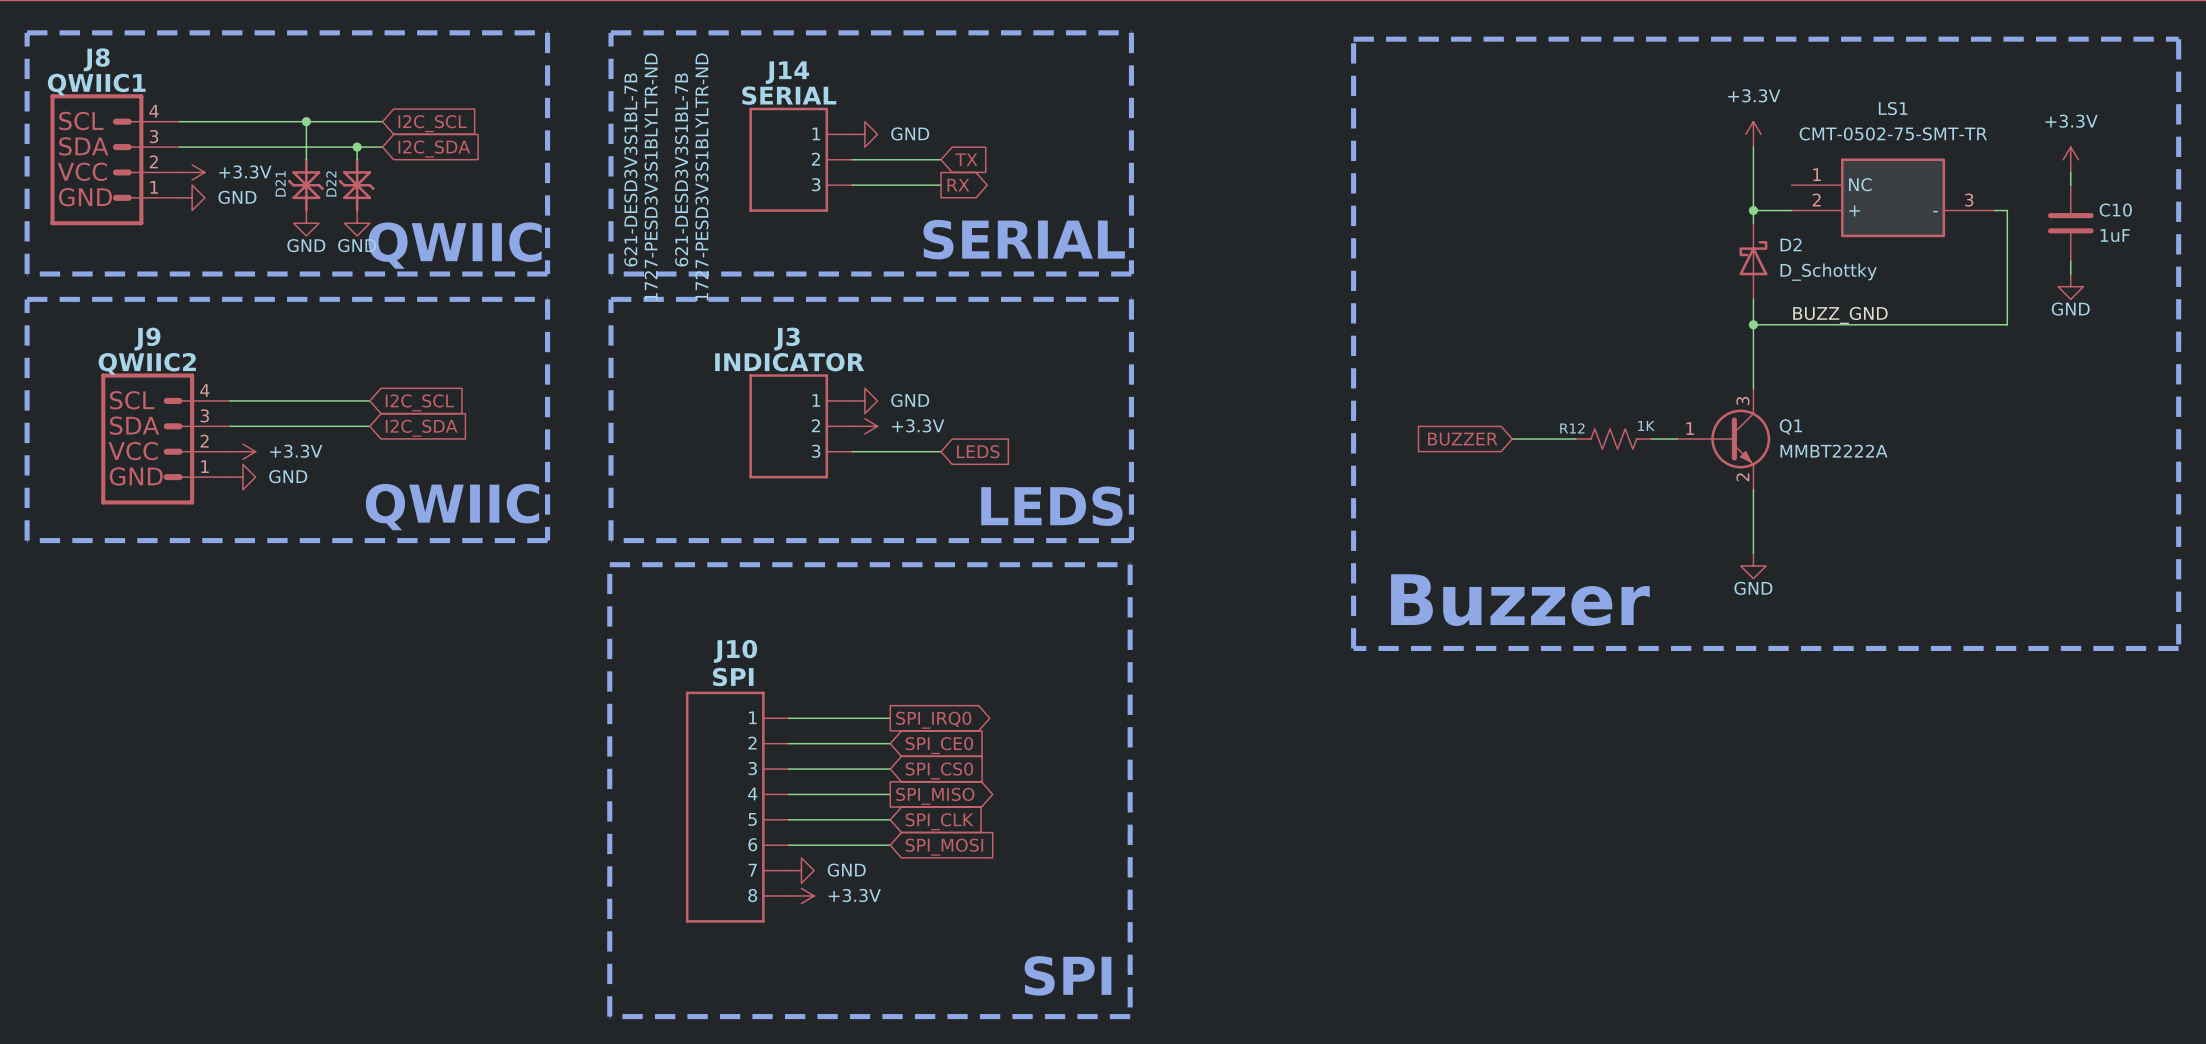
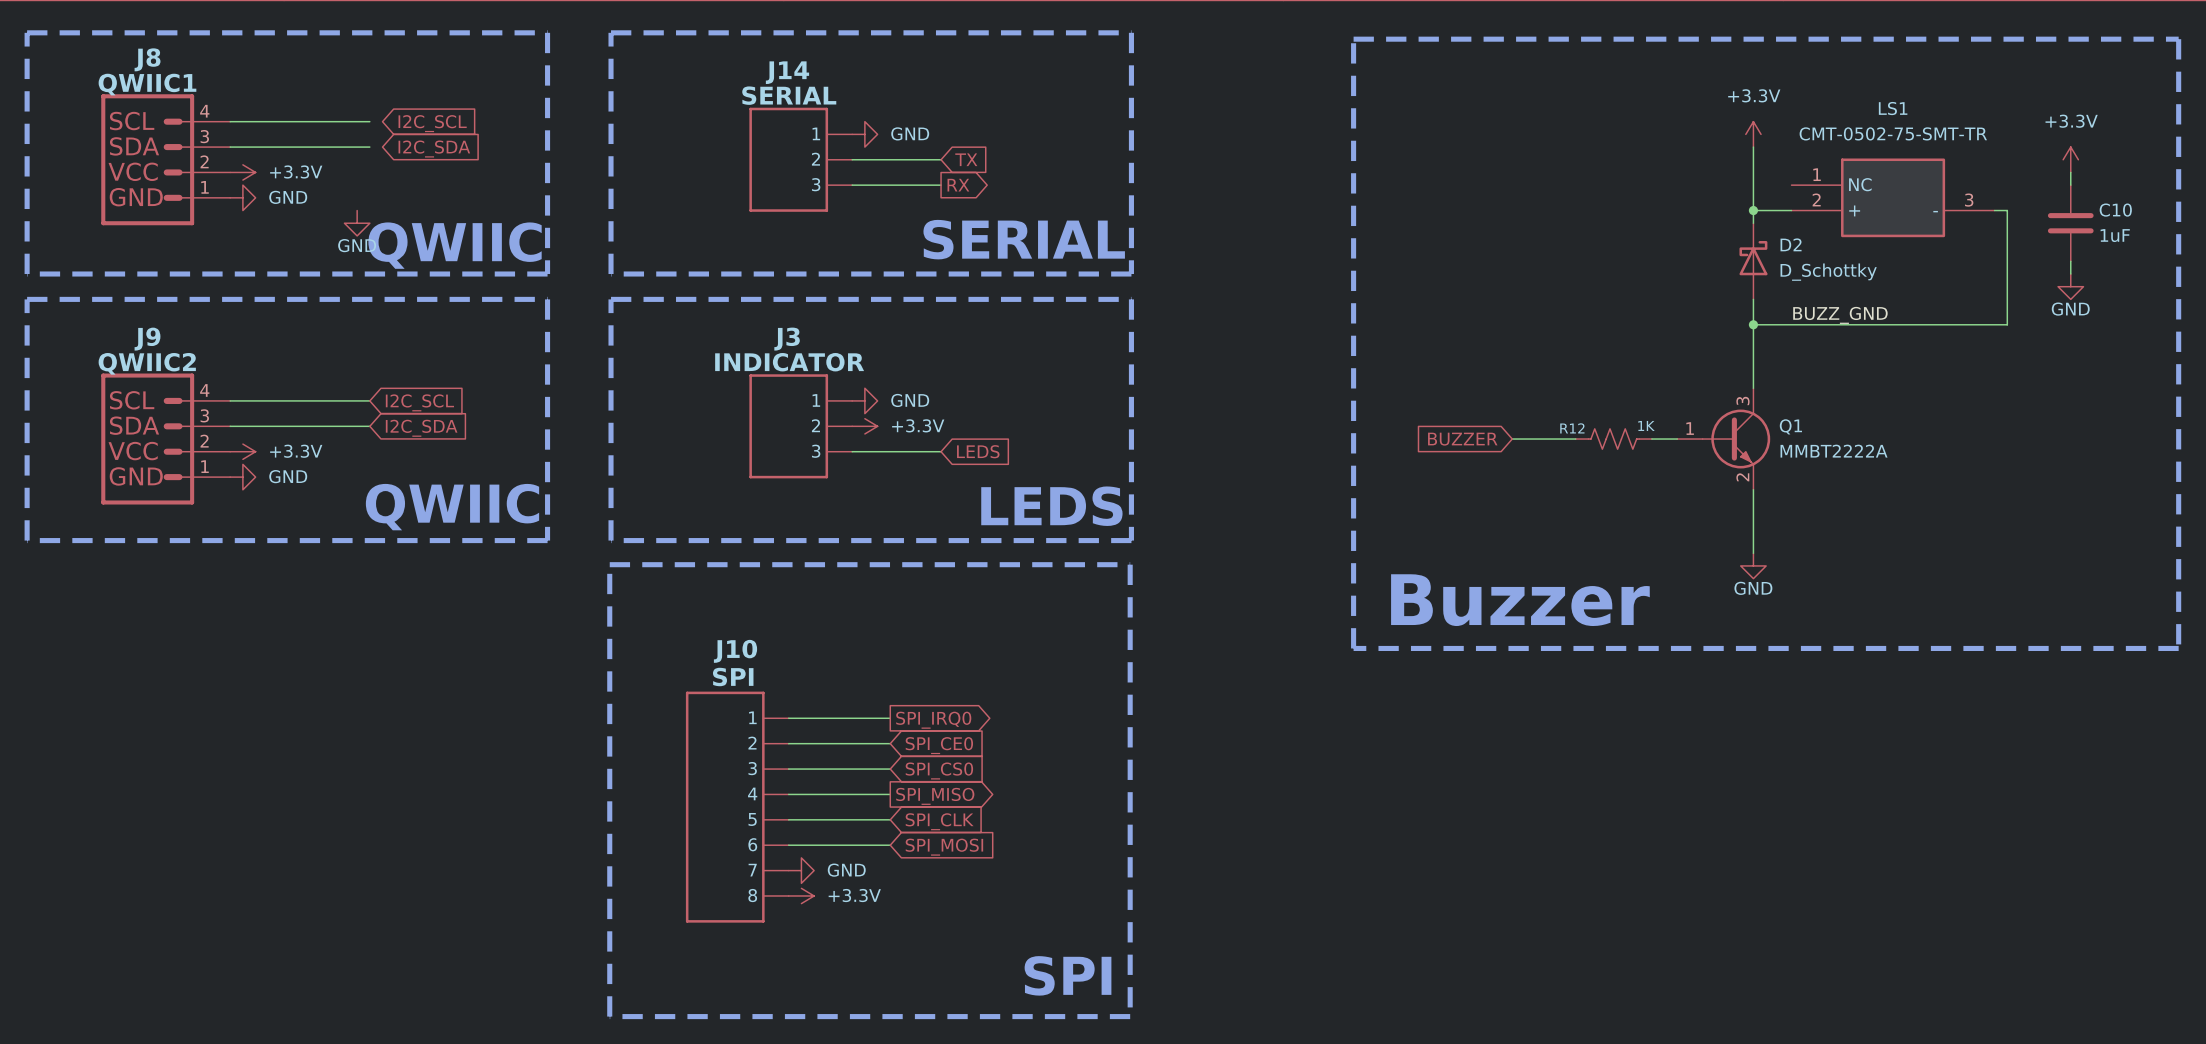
wire: (306, 121) (306, 159) -> none
junction: (306, 121) -> none
wire: (369, 121) (382, 121) -> none
wire: (357, 147) (357, 159) -> none
junction: (357, 147) -> none
wire: (369, 147) (382, 147) -> none
J8 position: (114, 159) -> (165, 159)
power symbol position: +3.3V (192, 172) -> +3.3V (242, 172)
D21: (305, 185) -> none
D22: (356, 185) -> none
power symbol: GND (192, 197) -> none
power symbol: none -> GND (242, 197)
power symbol: GND (306, 223) -> none

